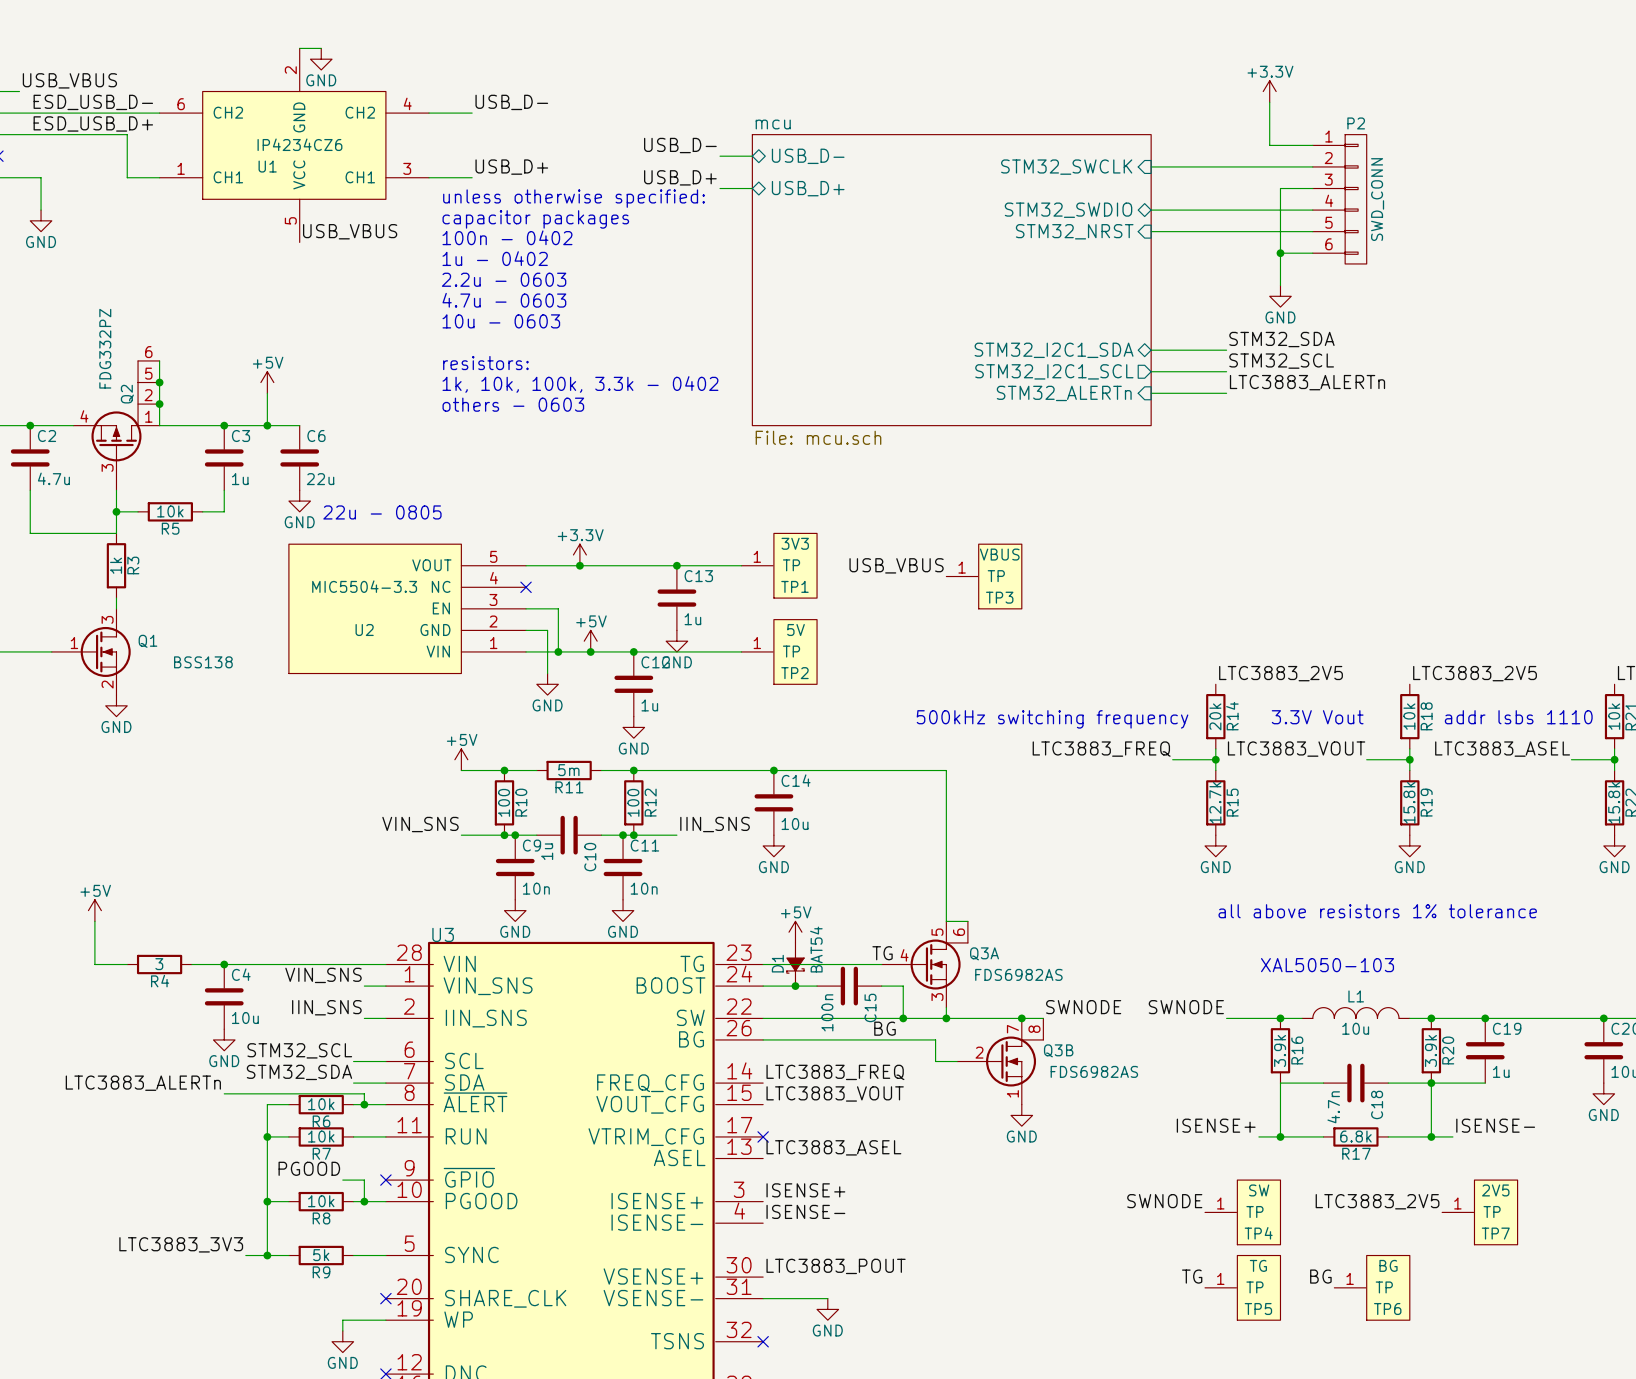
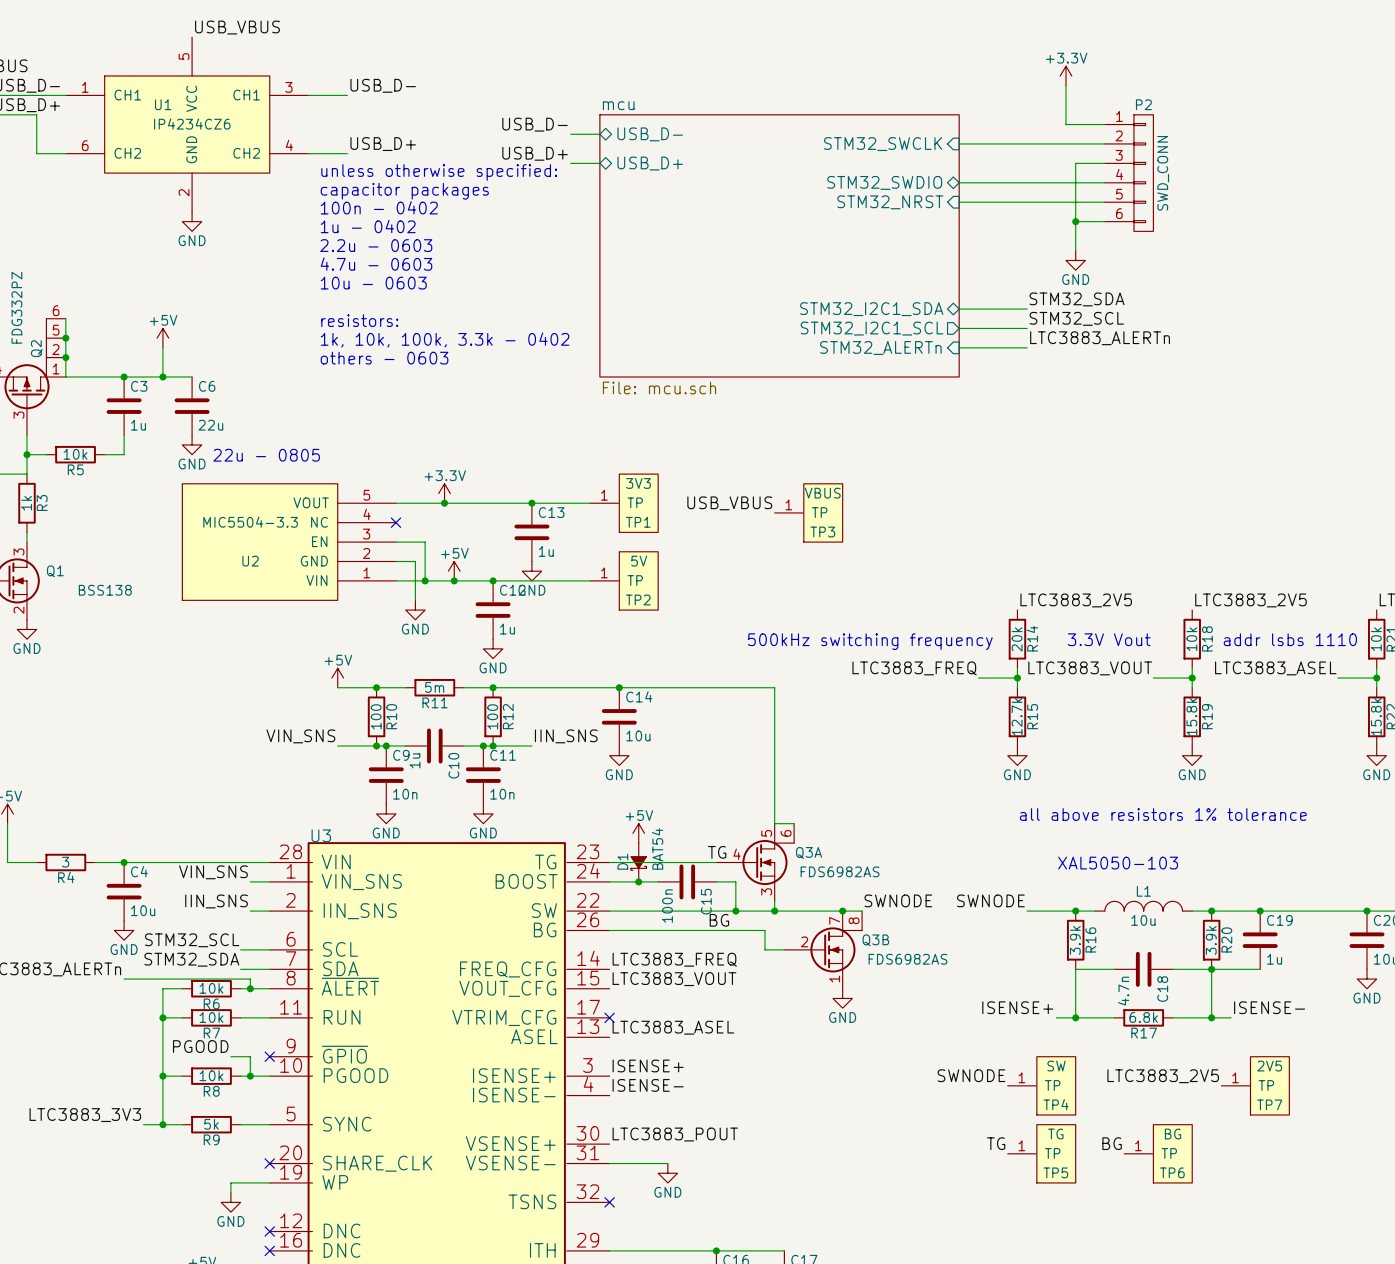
wire: (299, 48) (321, 48) -> none
power symbol position: GND (321, 59) -> GND (192, 221)
U1 flip: as is (294, 145) -> up-down (187, 124)
label position: USB_VBUS (350, 231) -> USB_VBUS (237, 27)

